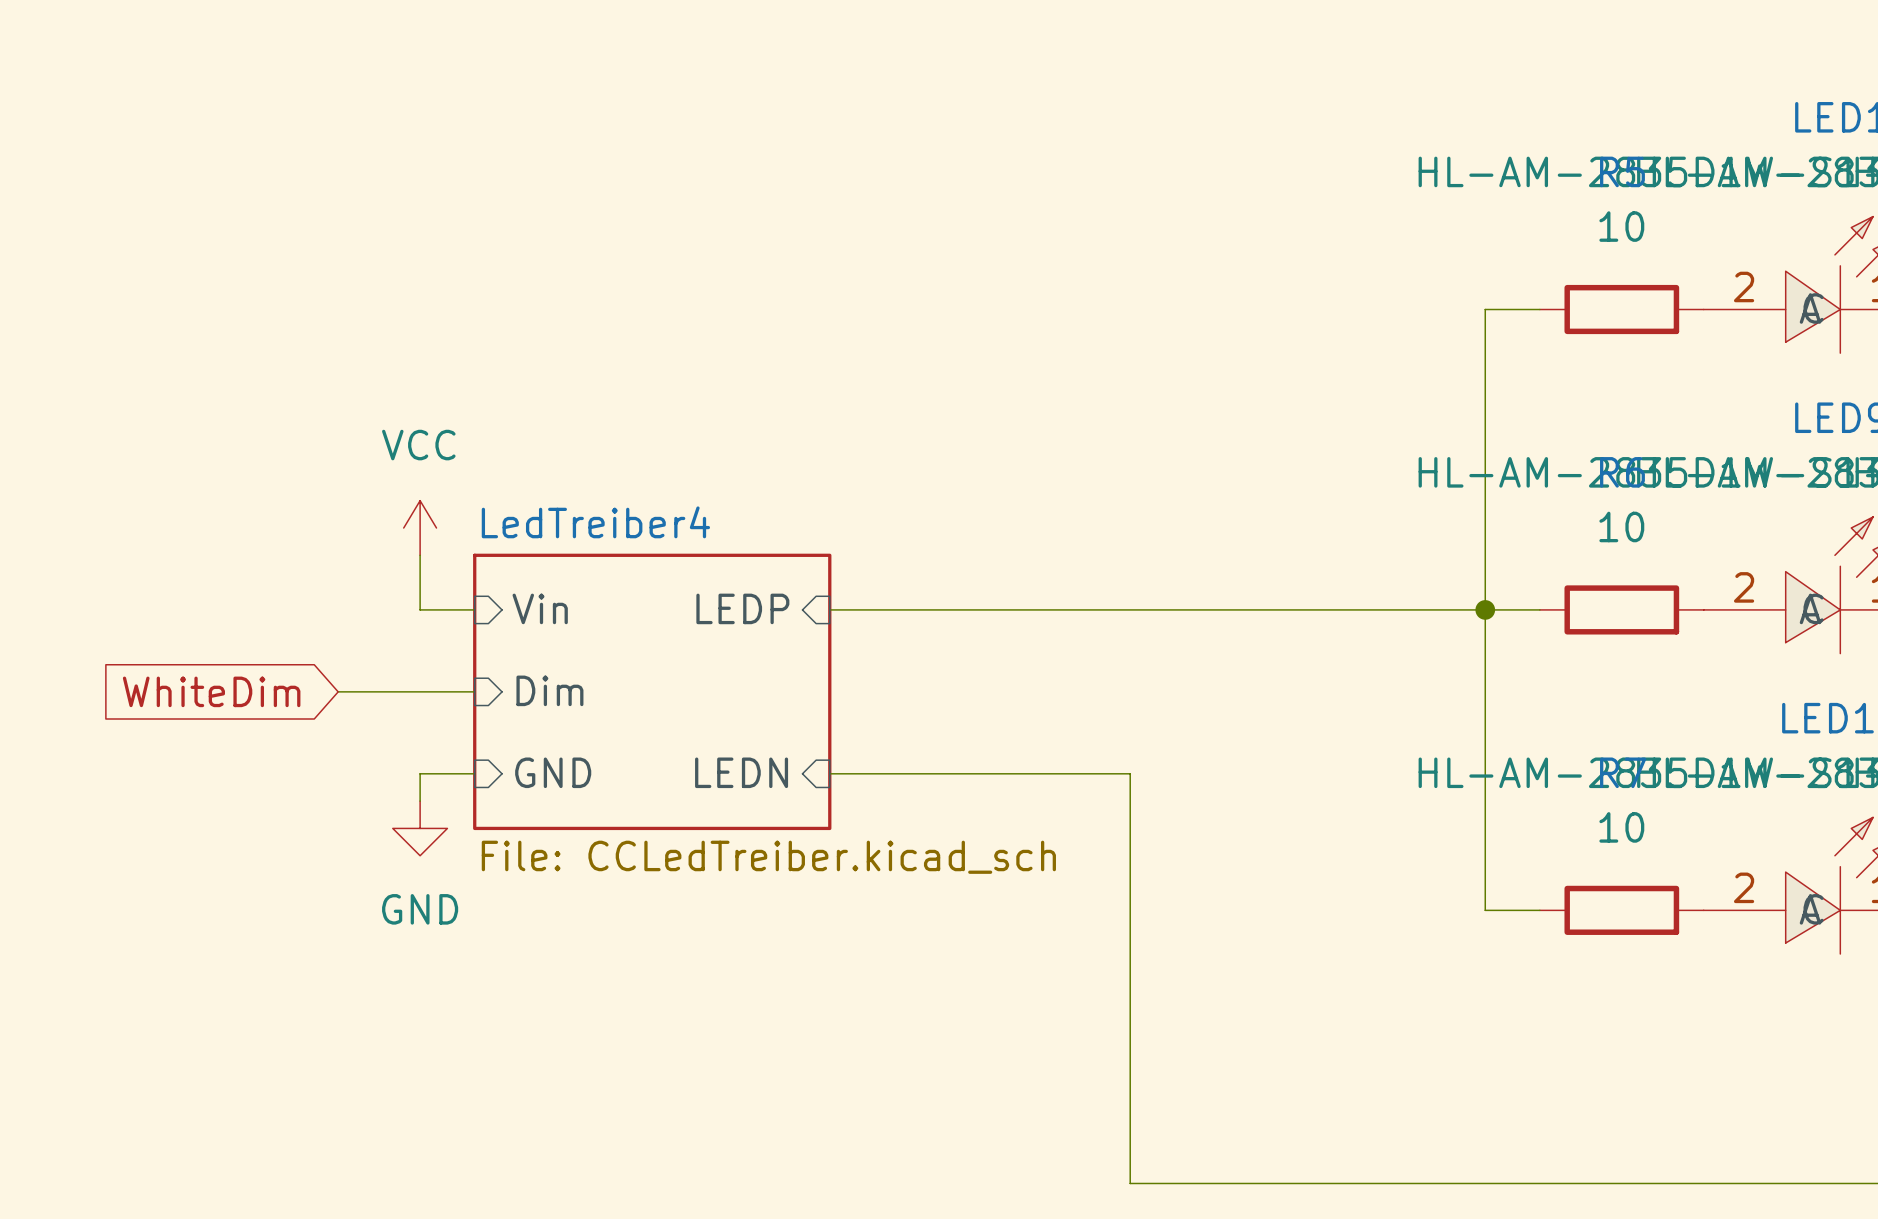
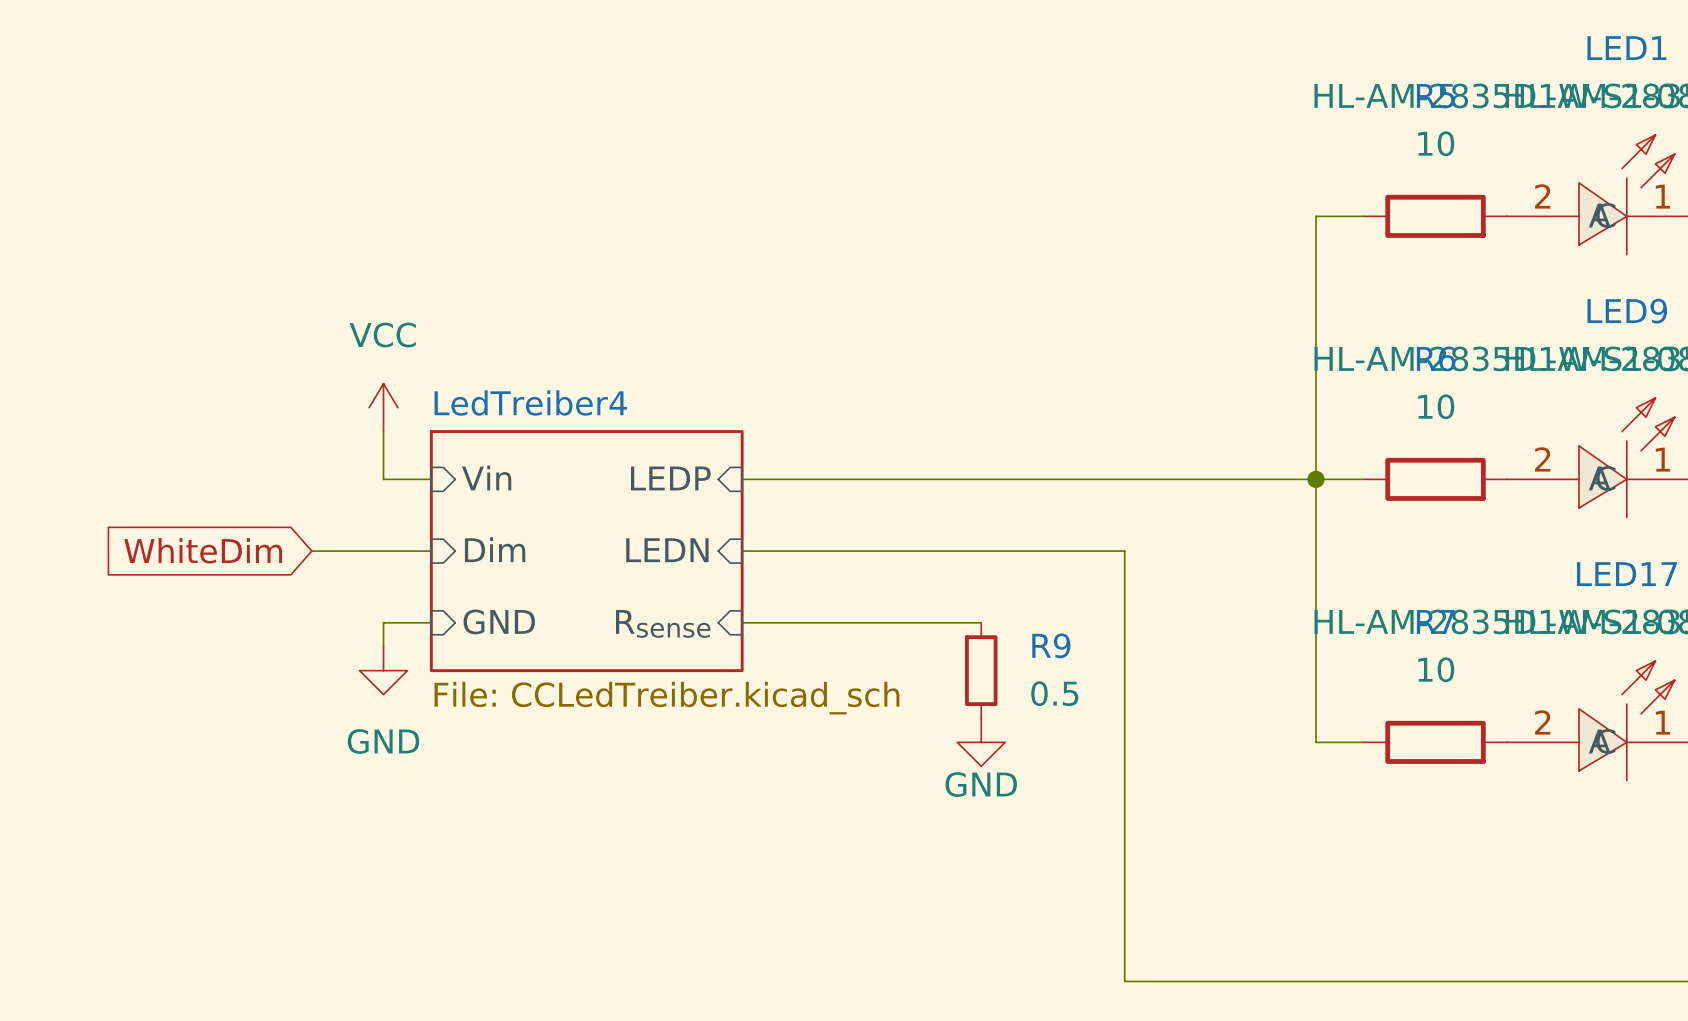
sheet pin: none -> LEDN (667, 550)
sheet pin: LEDN (741, 772) -> Rsense (663, 623)
wire: (1102, 773) (1130, 773) (1130, 1183) (1266, 1183) -> (742, 551) (1124, 551) (1124, 981)
R9: none -> 0.5 (981, 670)
power symbol: none -> GND (981, 742)

